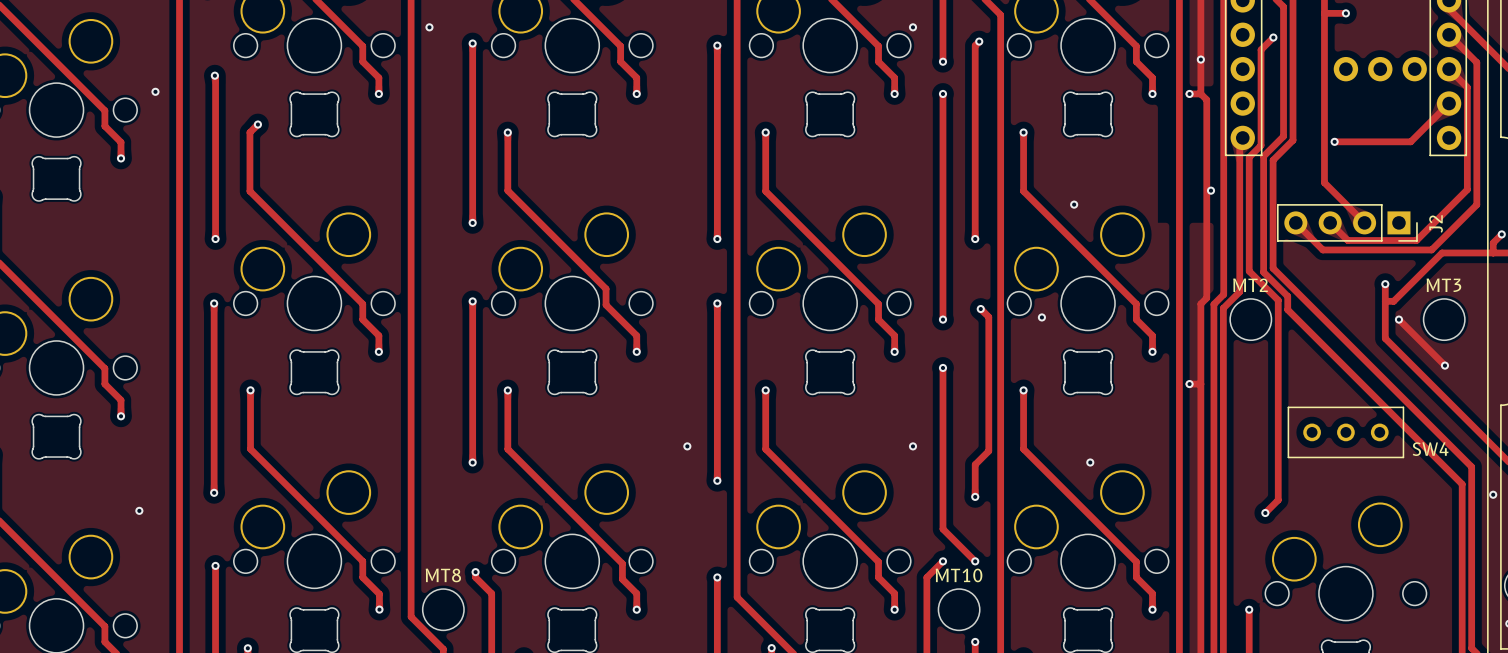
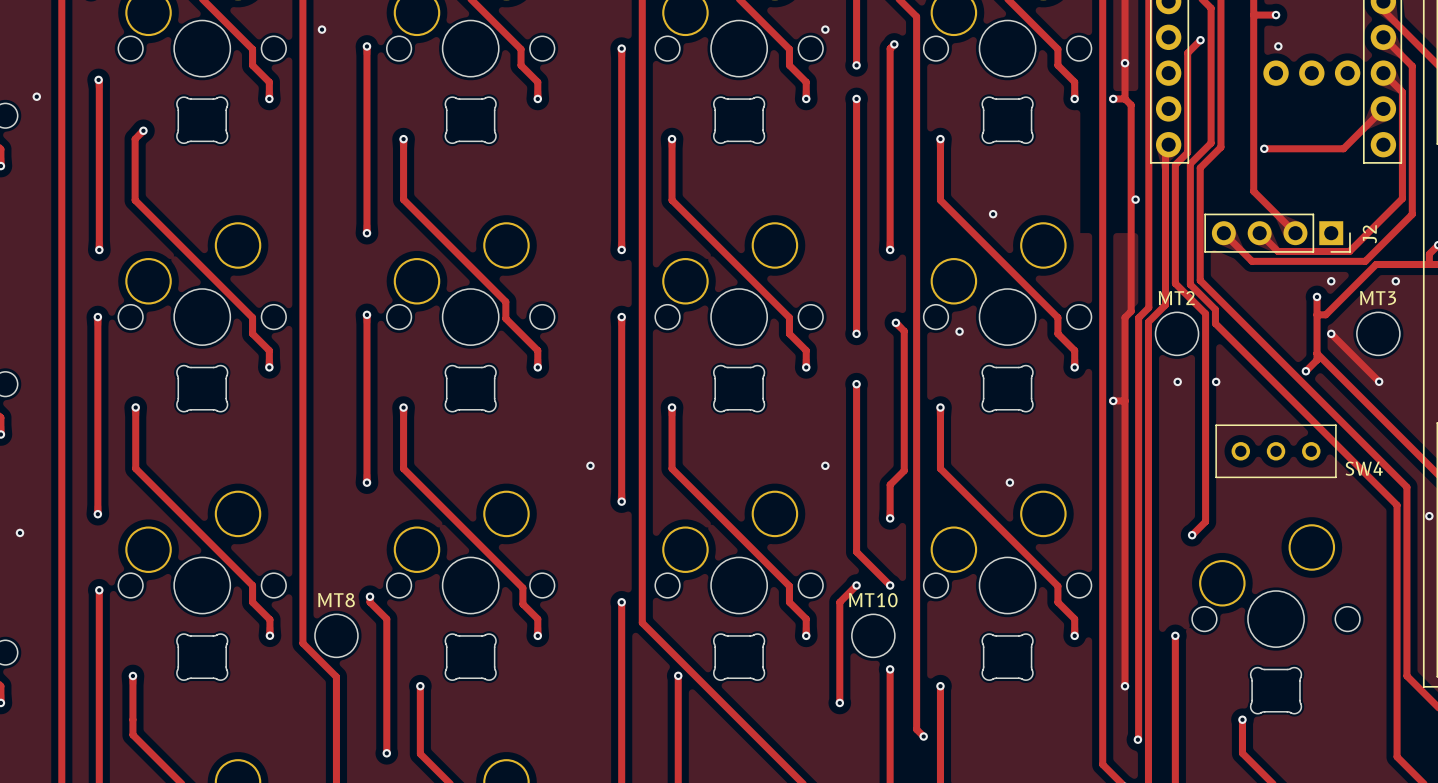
via: none -> (1278, 46)
via: none -> (1331, 281)
via: none -> (1395, 281)
track: none -> (1317, 353) (1317, 360) (1305, 371)
via: none -> (1305, 371)
via: none -> (1177, 381)
via: none -> (1216, 381)

